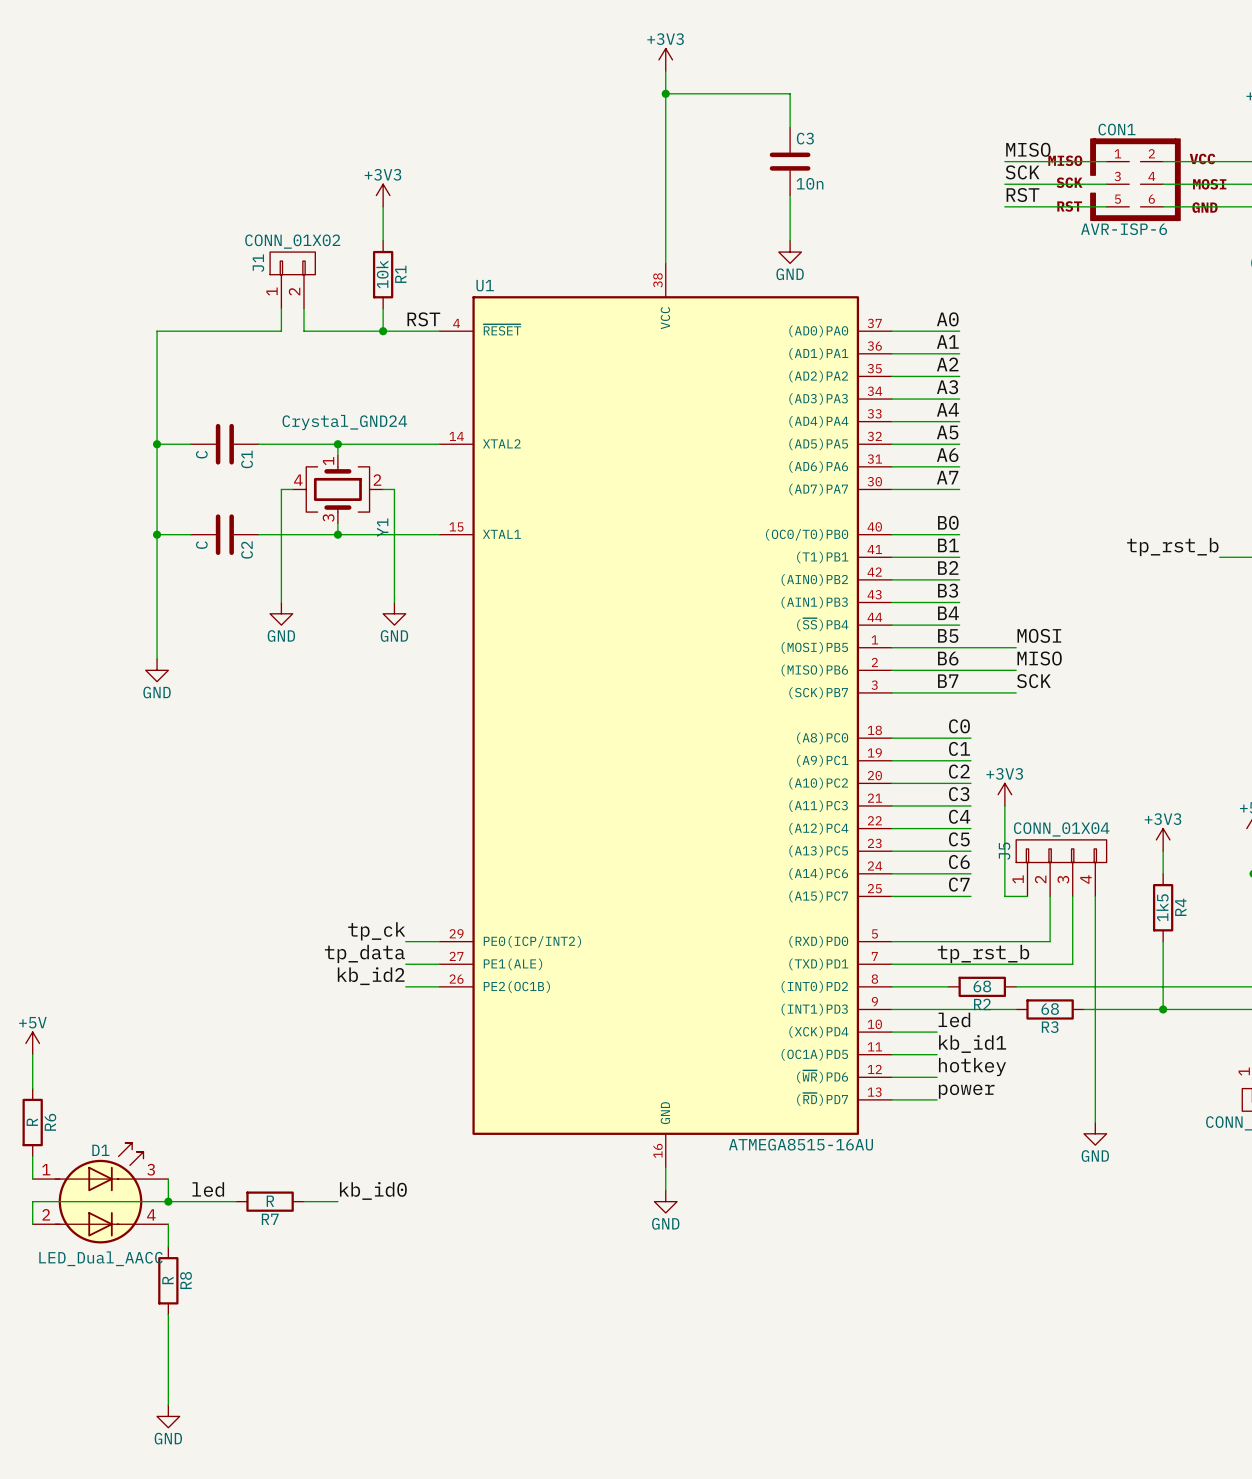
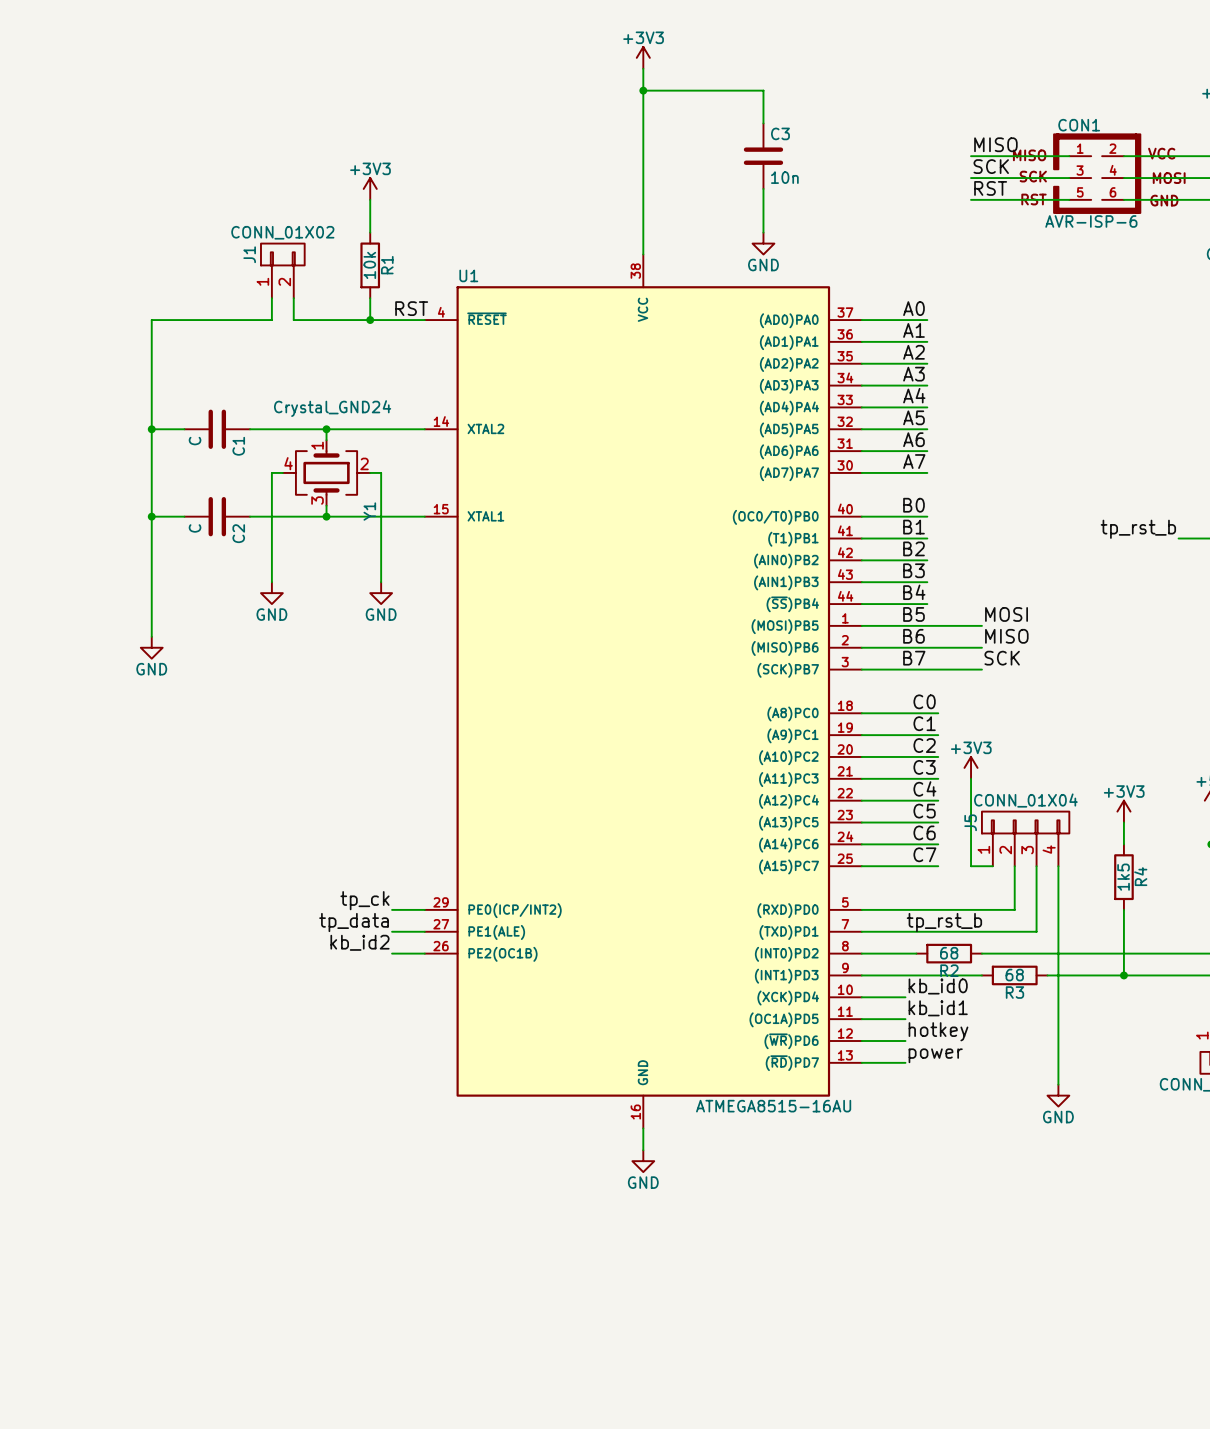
label: led (954, 1019) -> kb_id0 (938, 986)
power symbol: +5V (32, 1043) -> none
wire: (32, 1054) (32, 1088) -> none
R6: R (32, 1122) -> none
wire: (32, 1156) (32, 1179) -> none
wire: (168, 1179) (168, 1201) -> none
label: led (208, 1189) -> none
label: kb_id0 (373, 1190) -> none
D1: LED_Dual_AACC (100, 1193) -> none
junction: (168, 1201) -> none
wire: (236, 1201) (32, 1201) (32, 1224) -> none
R7: R (270, 1201) -> none
wire: (304, 1201) (337, 1201) -> none
wire: (168, 1224) (168, 1246) -> none
R8: R (168, 1280) -> none
wire: (168, 1314) (168, 1405) -> none
power symbol: GND (168, 1416) -> none

